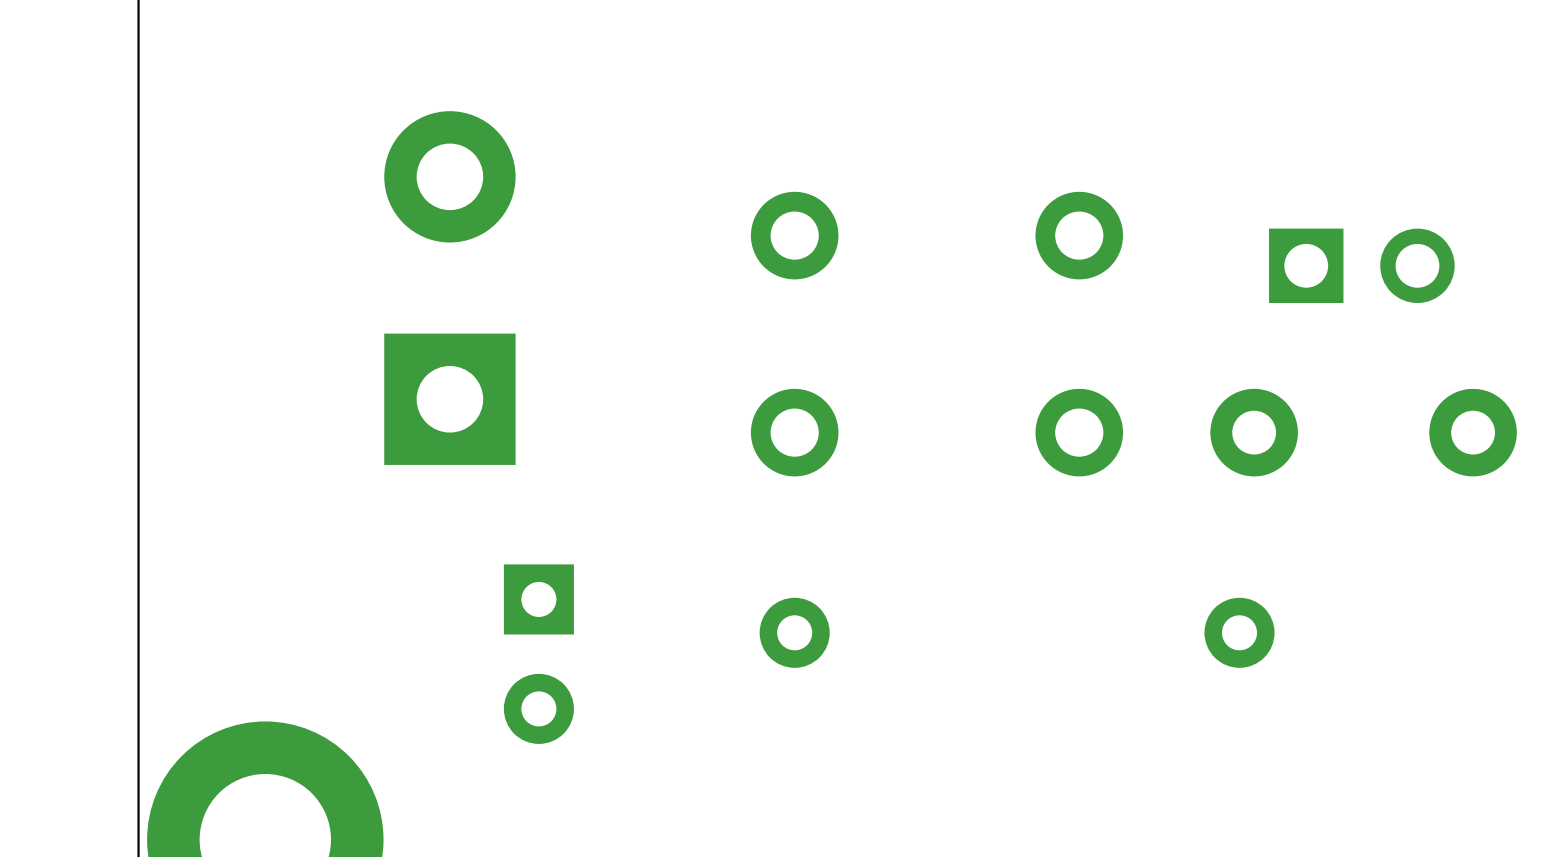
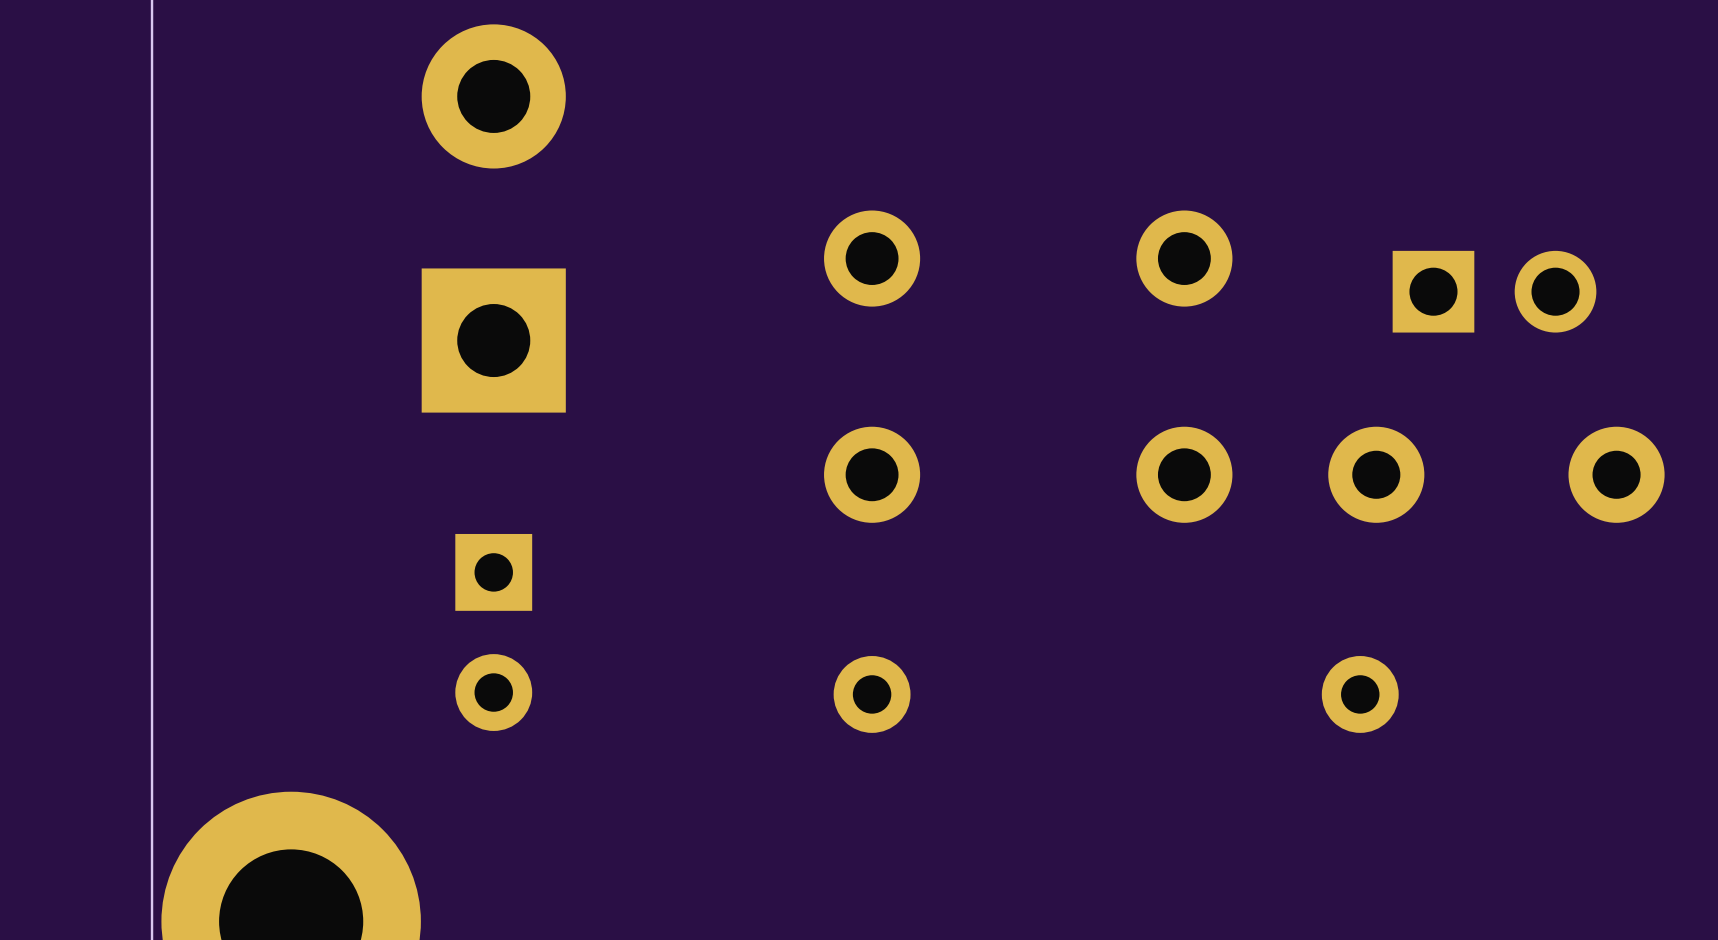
part position: (449, 288) -> (493, 218)
part position: (538, 654) -> (493, 632)

